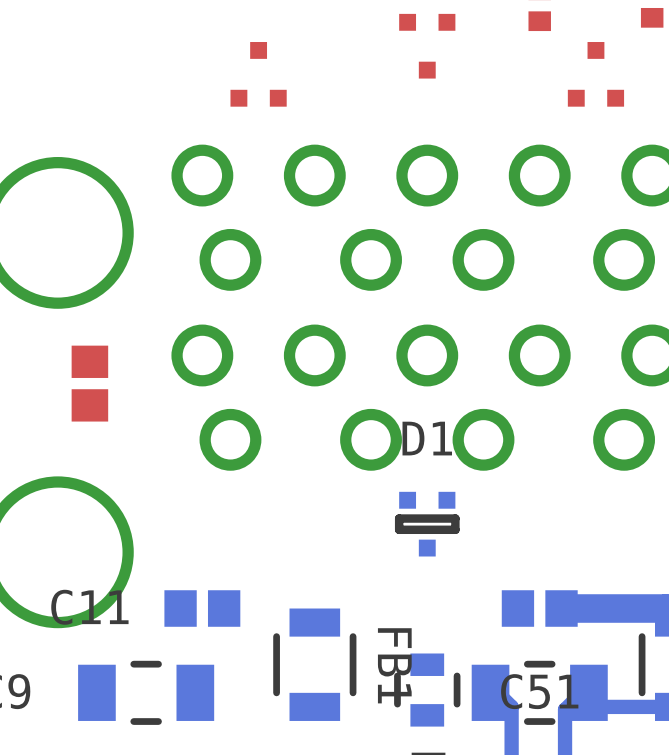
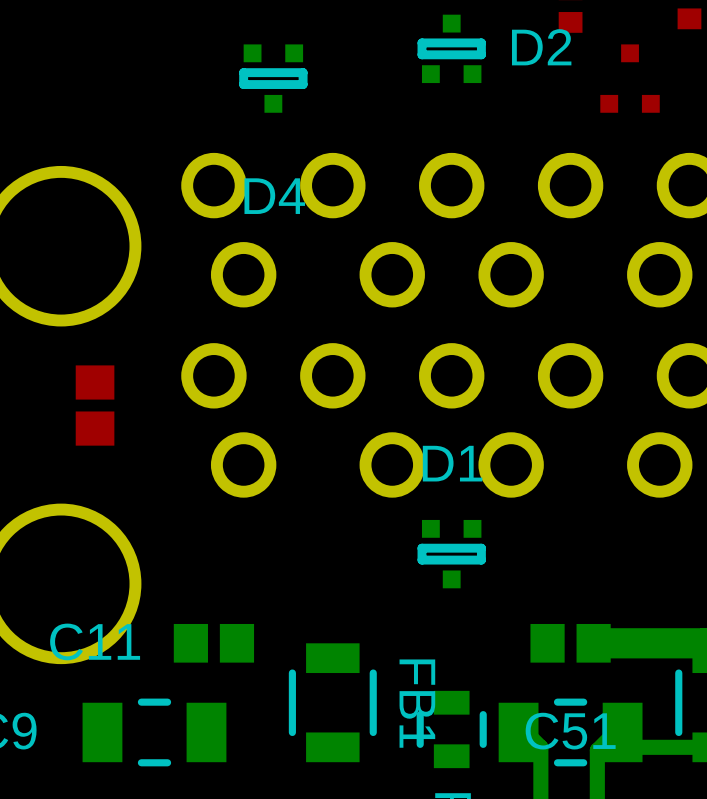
D2 side: top (427, 46) -> bottom (451, 48)
D4 side: top (258, 74) -> bottom (273, 78)

